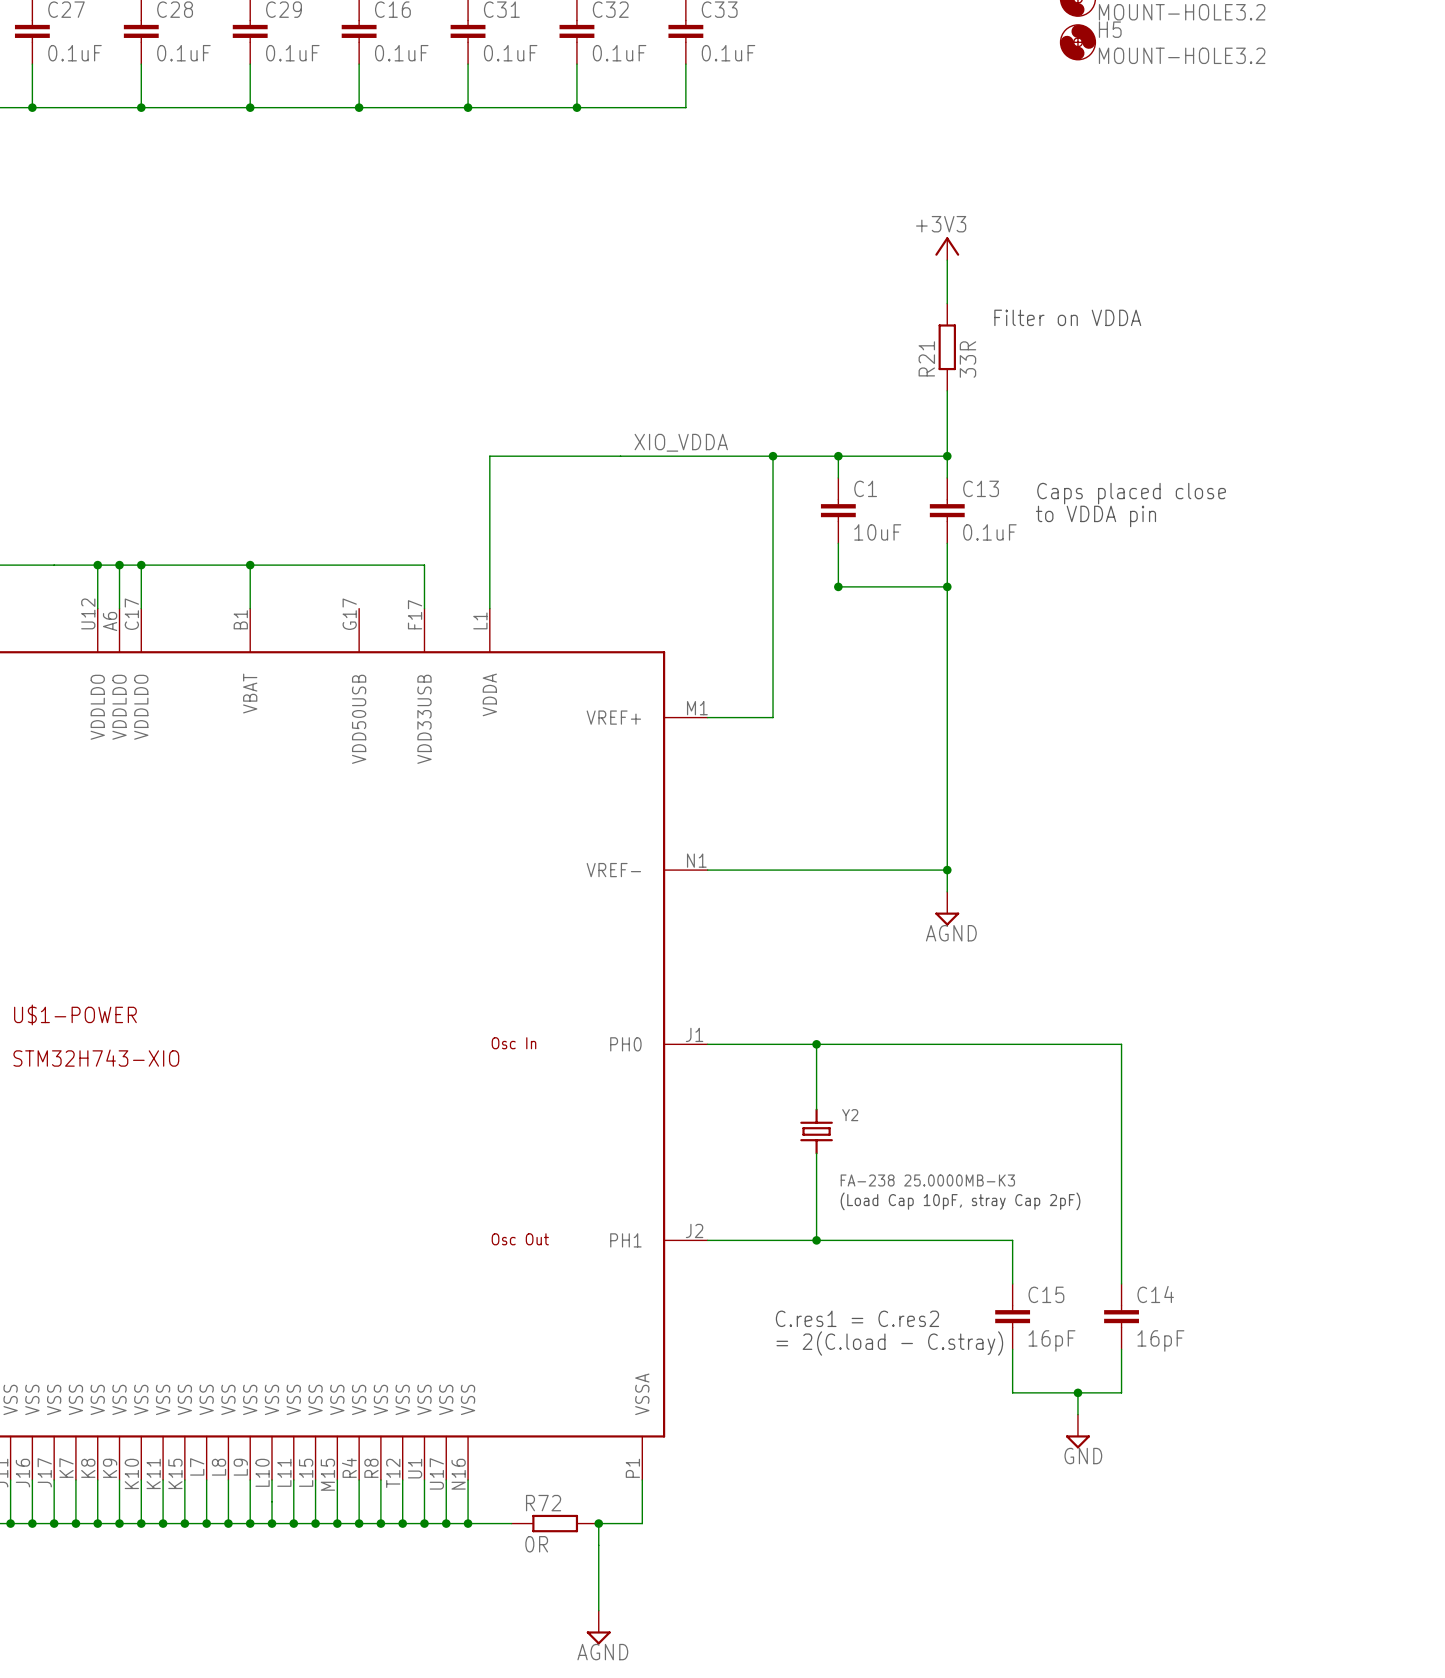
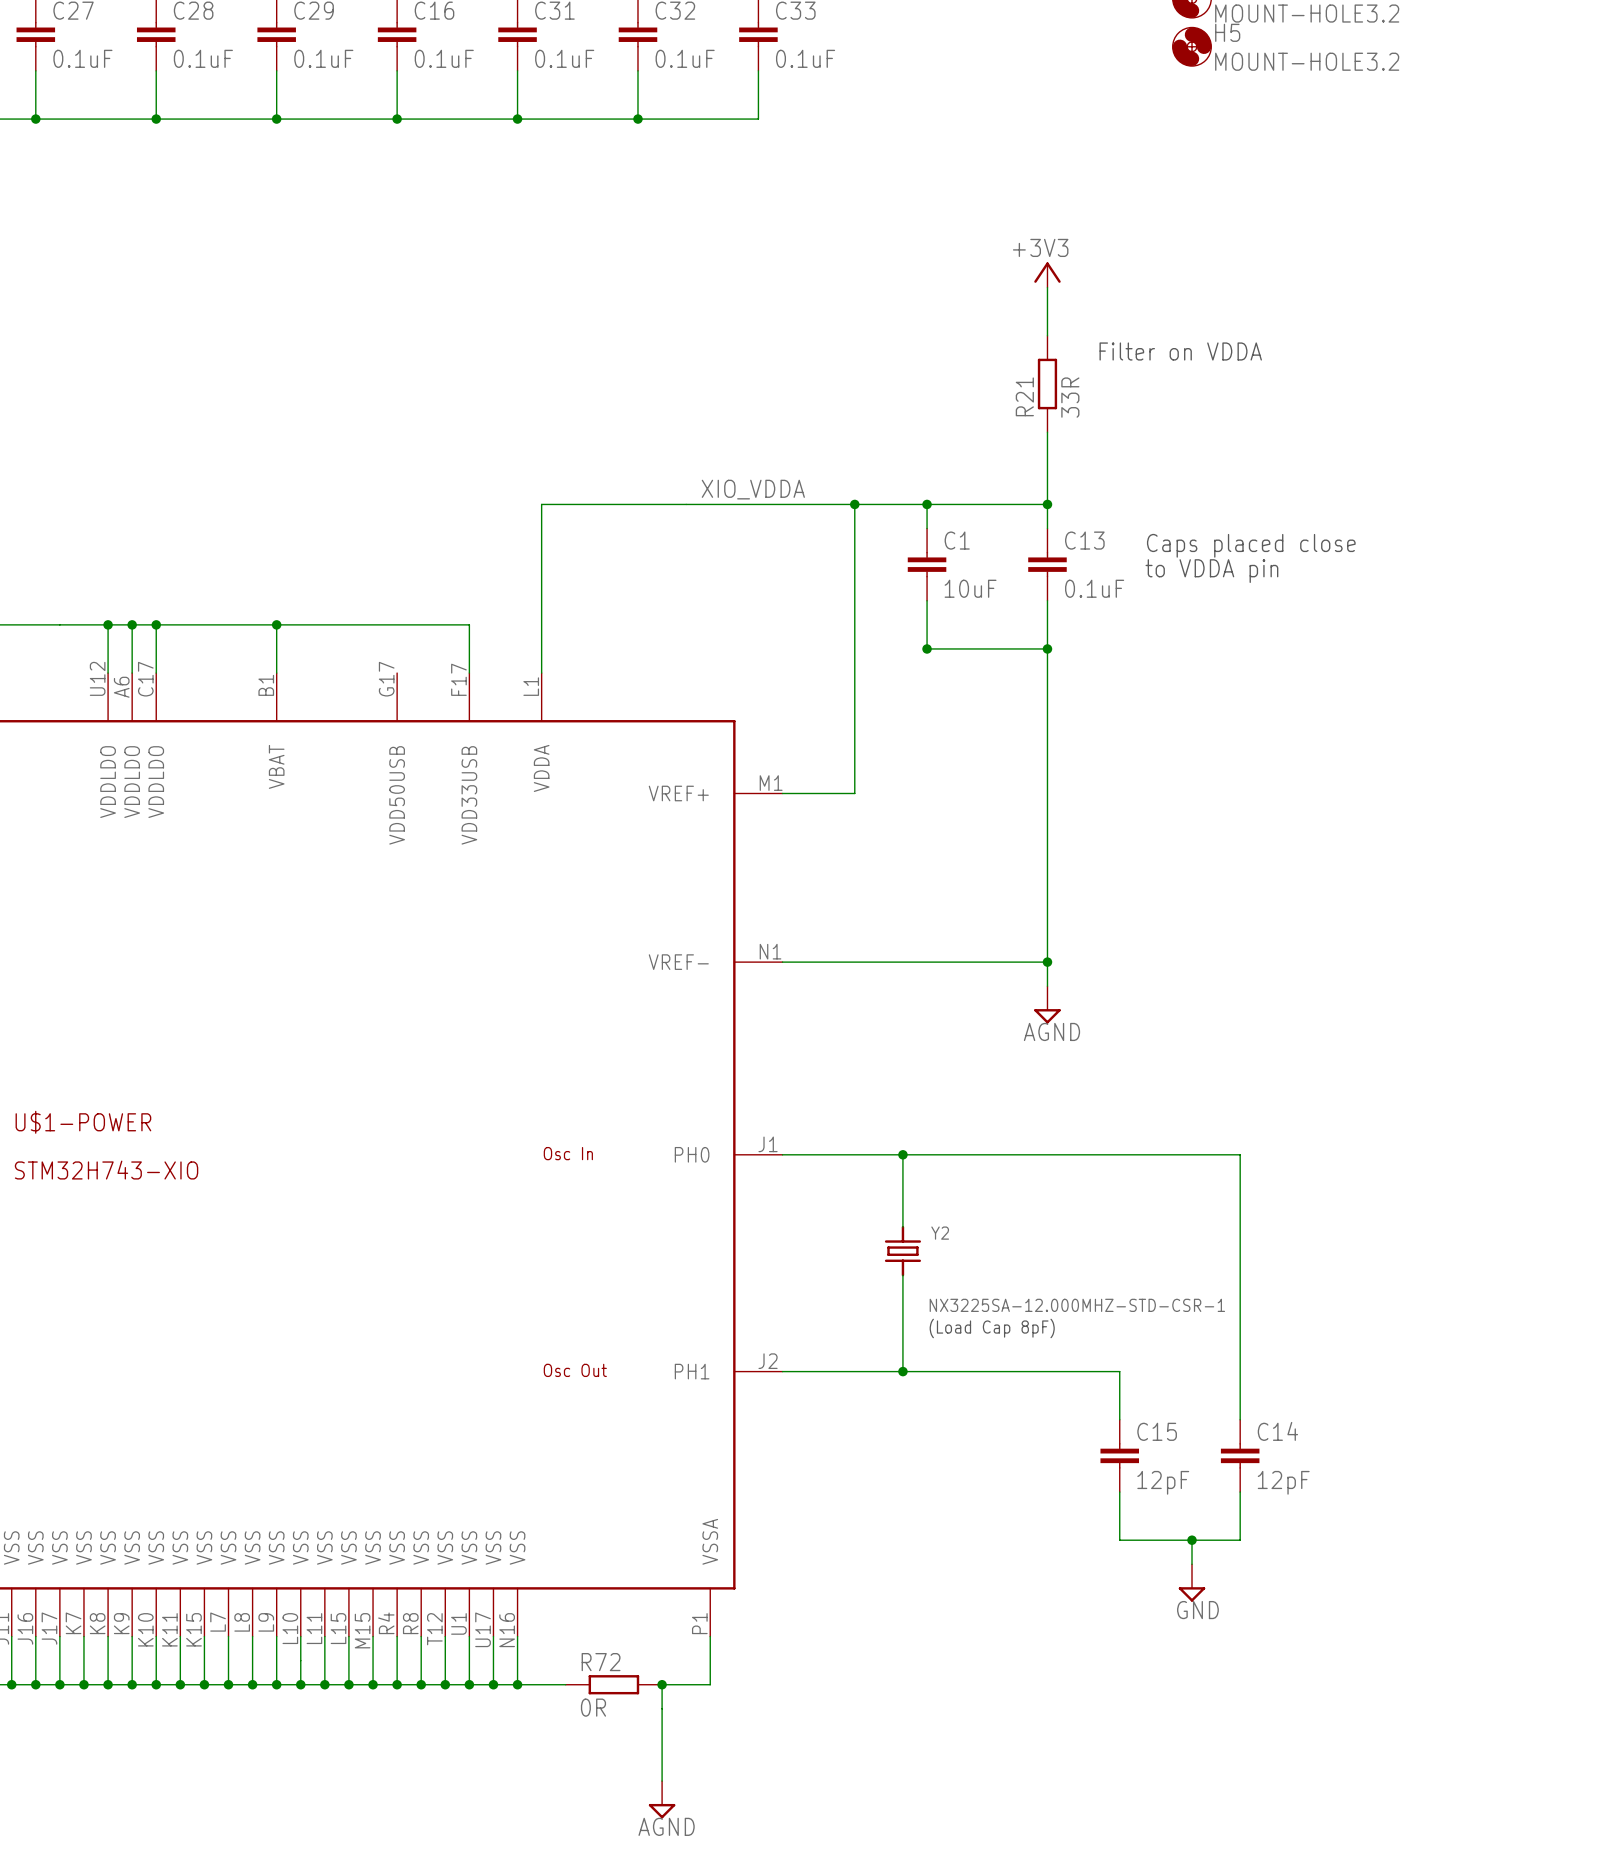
Y2 value: FA-238 25.0000MB-K3 (927, 1180) -> NX3225SA-12.000MHZ-STD-CSR-1 (1077, 1305)
text: (Load Cap 10pF, stray Cap 2pF) (960, 1201) -> (Load Cap 8pF) (992, 1328)
text: C.res1 = C.res2 (857, 1318) -> none
C15 value: 16pF (1051, 1340) -> 12pF (1163, 1482)
C14 value: 16pF (1160, 1340) -> 12pF (1283, 1482)
text: = 2(C.load - C.stray) (889, 1343) -> none

